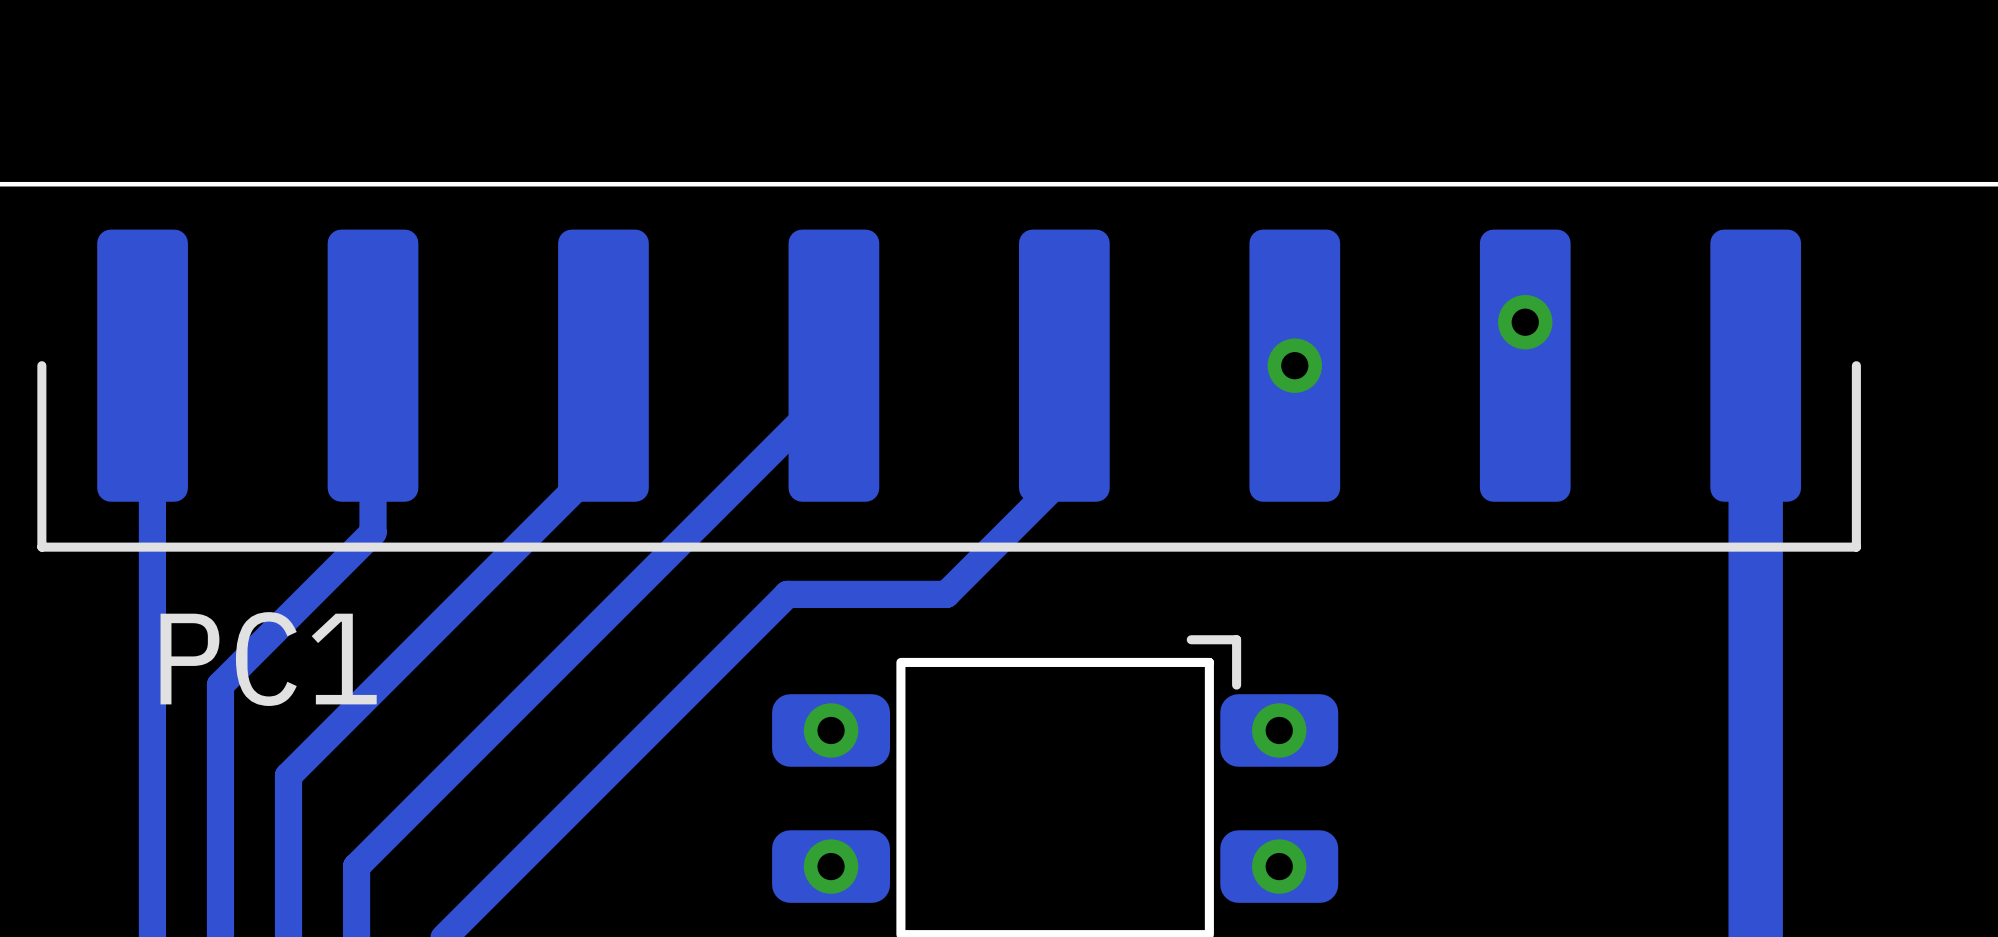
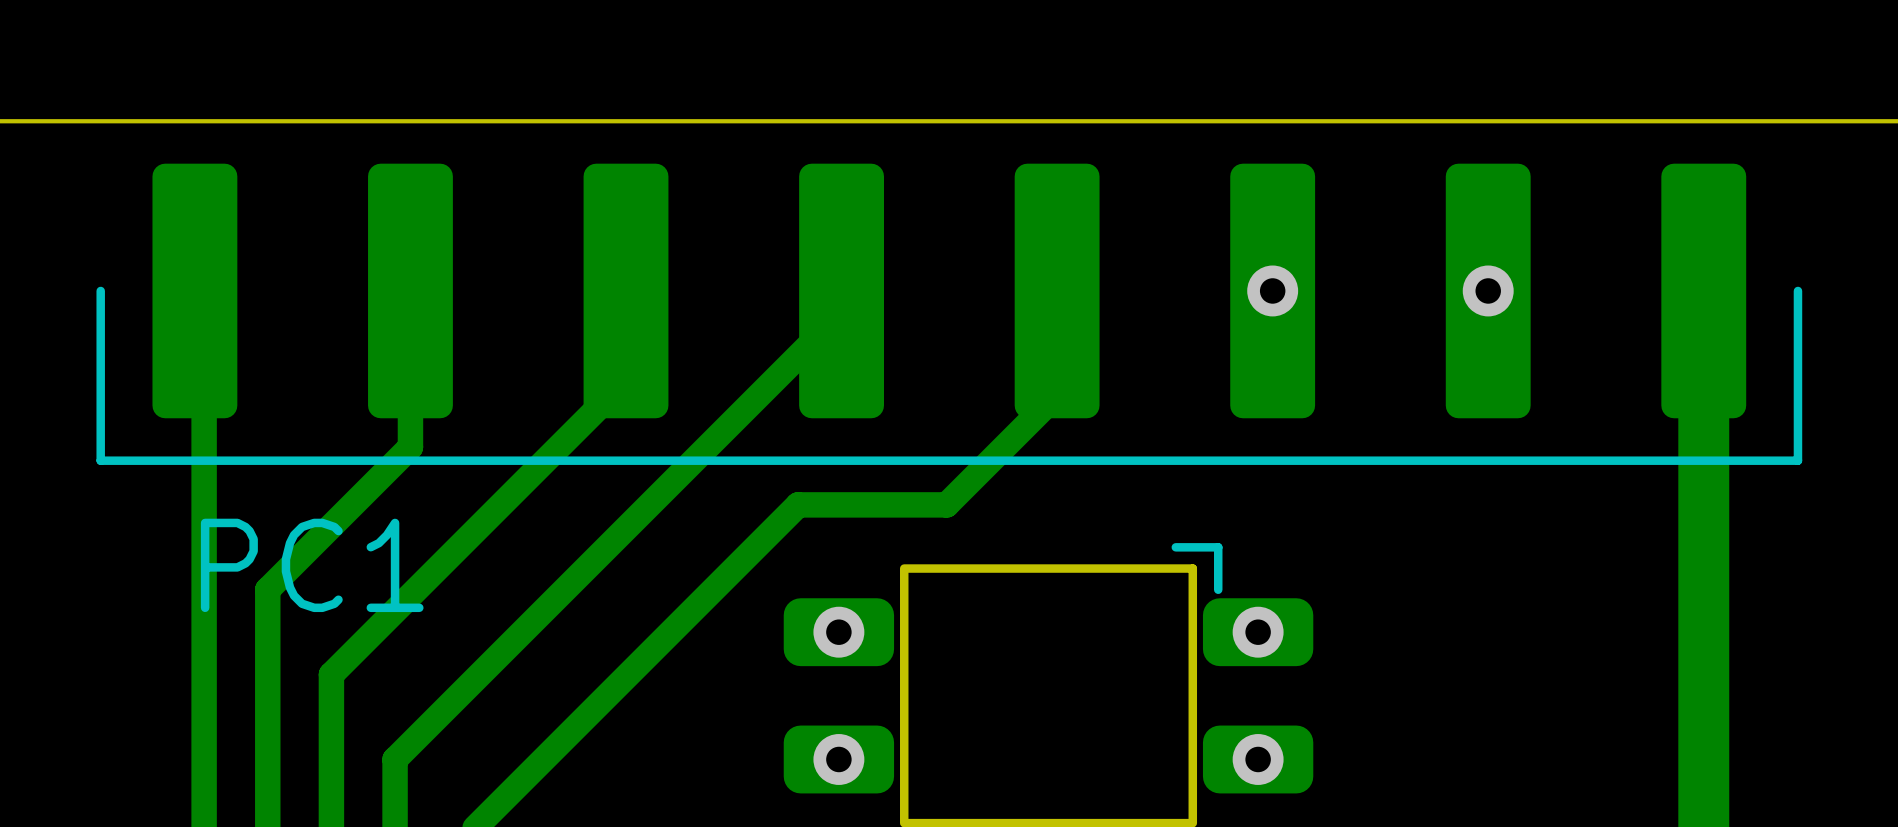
via position: (1525, 322) -> (1488, 290)

